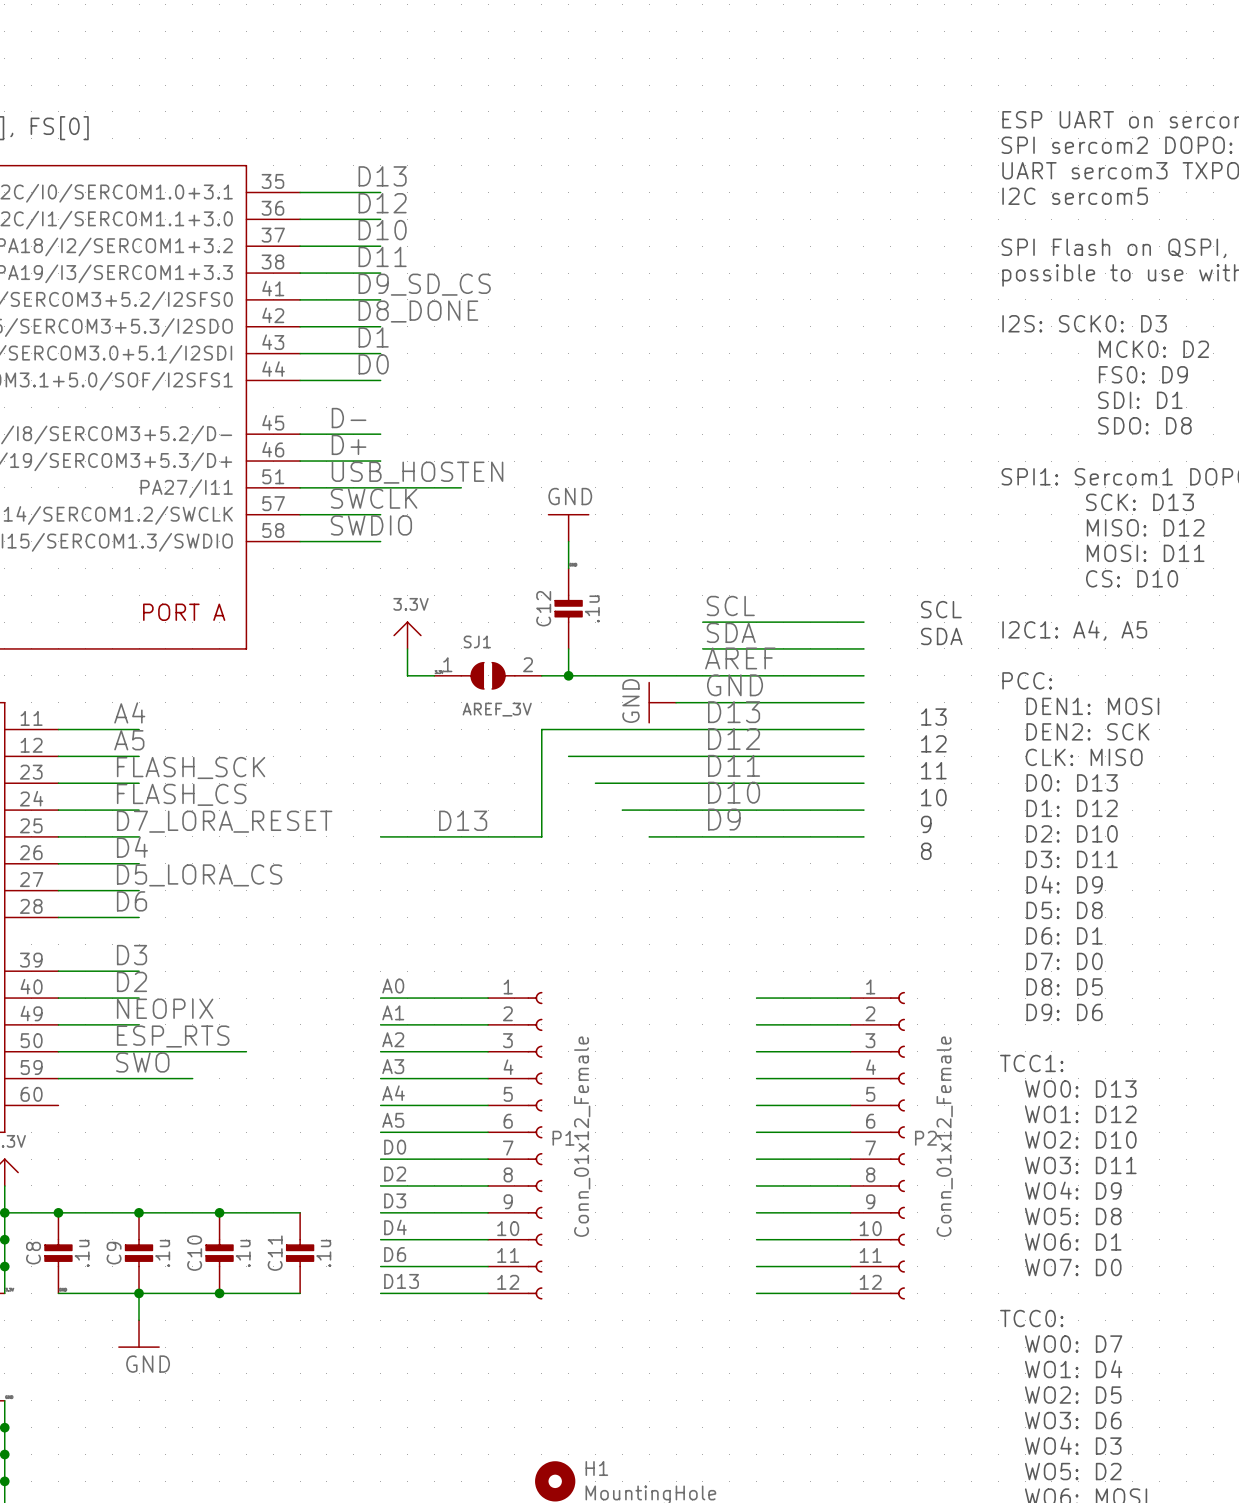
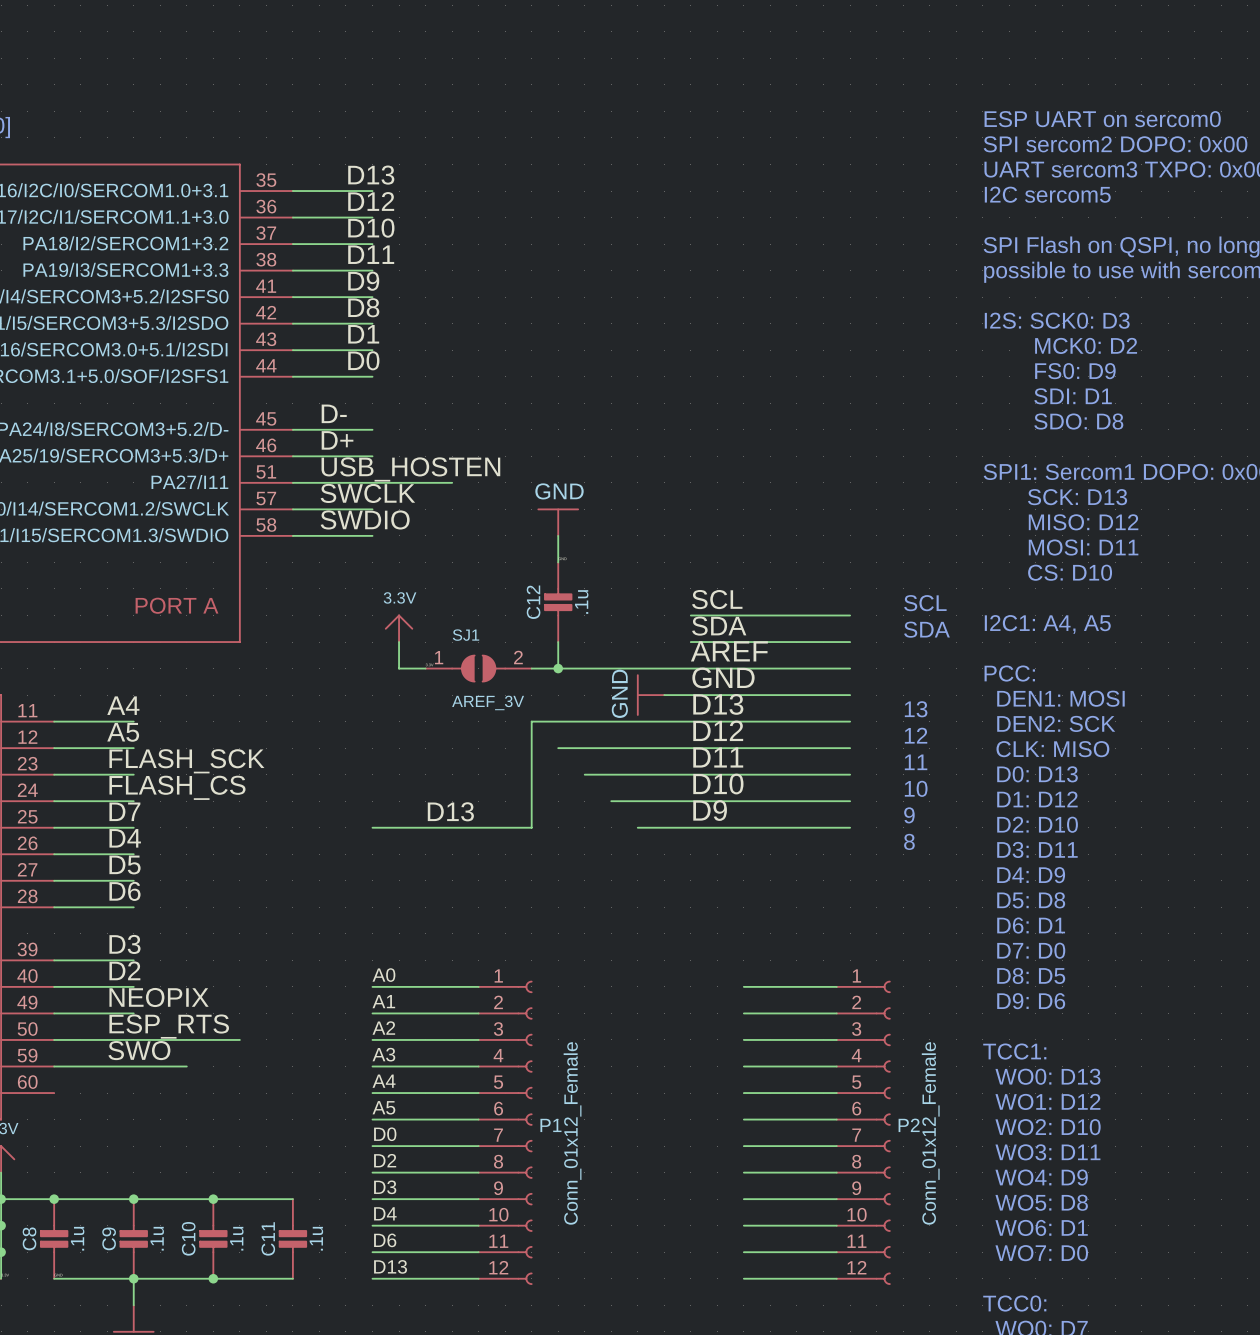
label: D9_SD_CS (424, 284) -> D9 (363, 281)
label: D8_DONE (418, 311) -> D8 (363, 307)
label: D7_LORA_RESET (224, 821) -> D7 (124, 811)
label: D5_LORA_CS (199, 875) -> D5 (125, 864)

